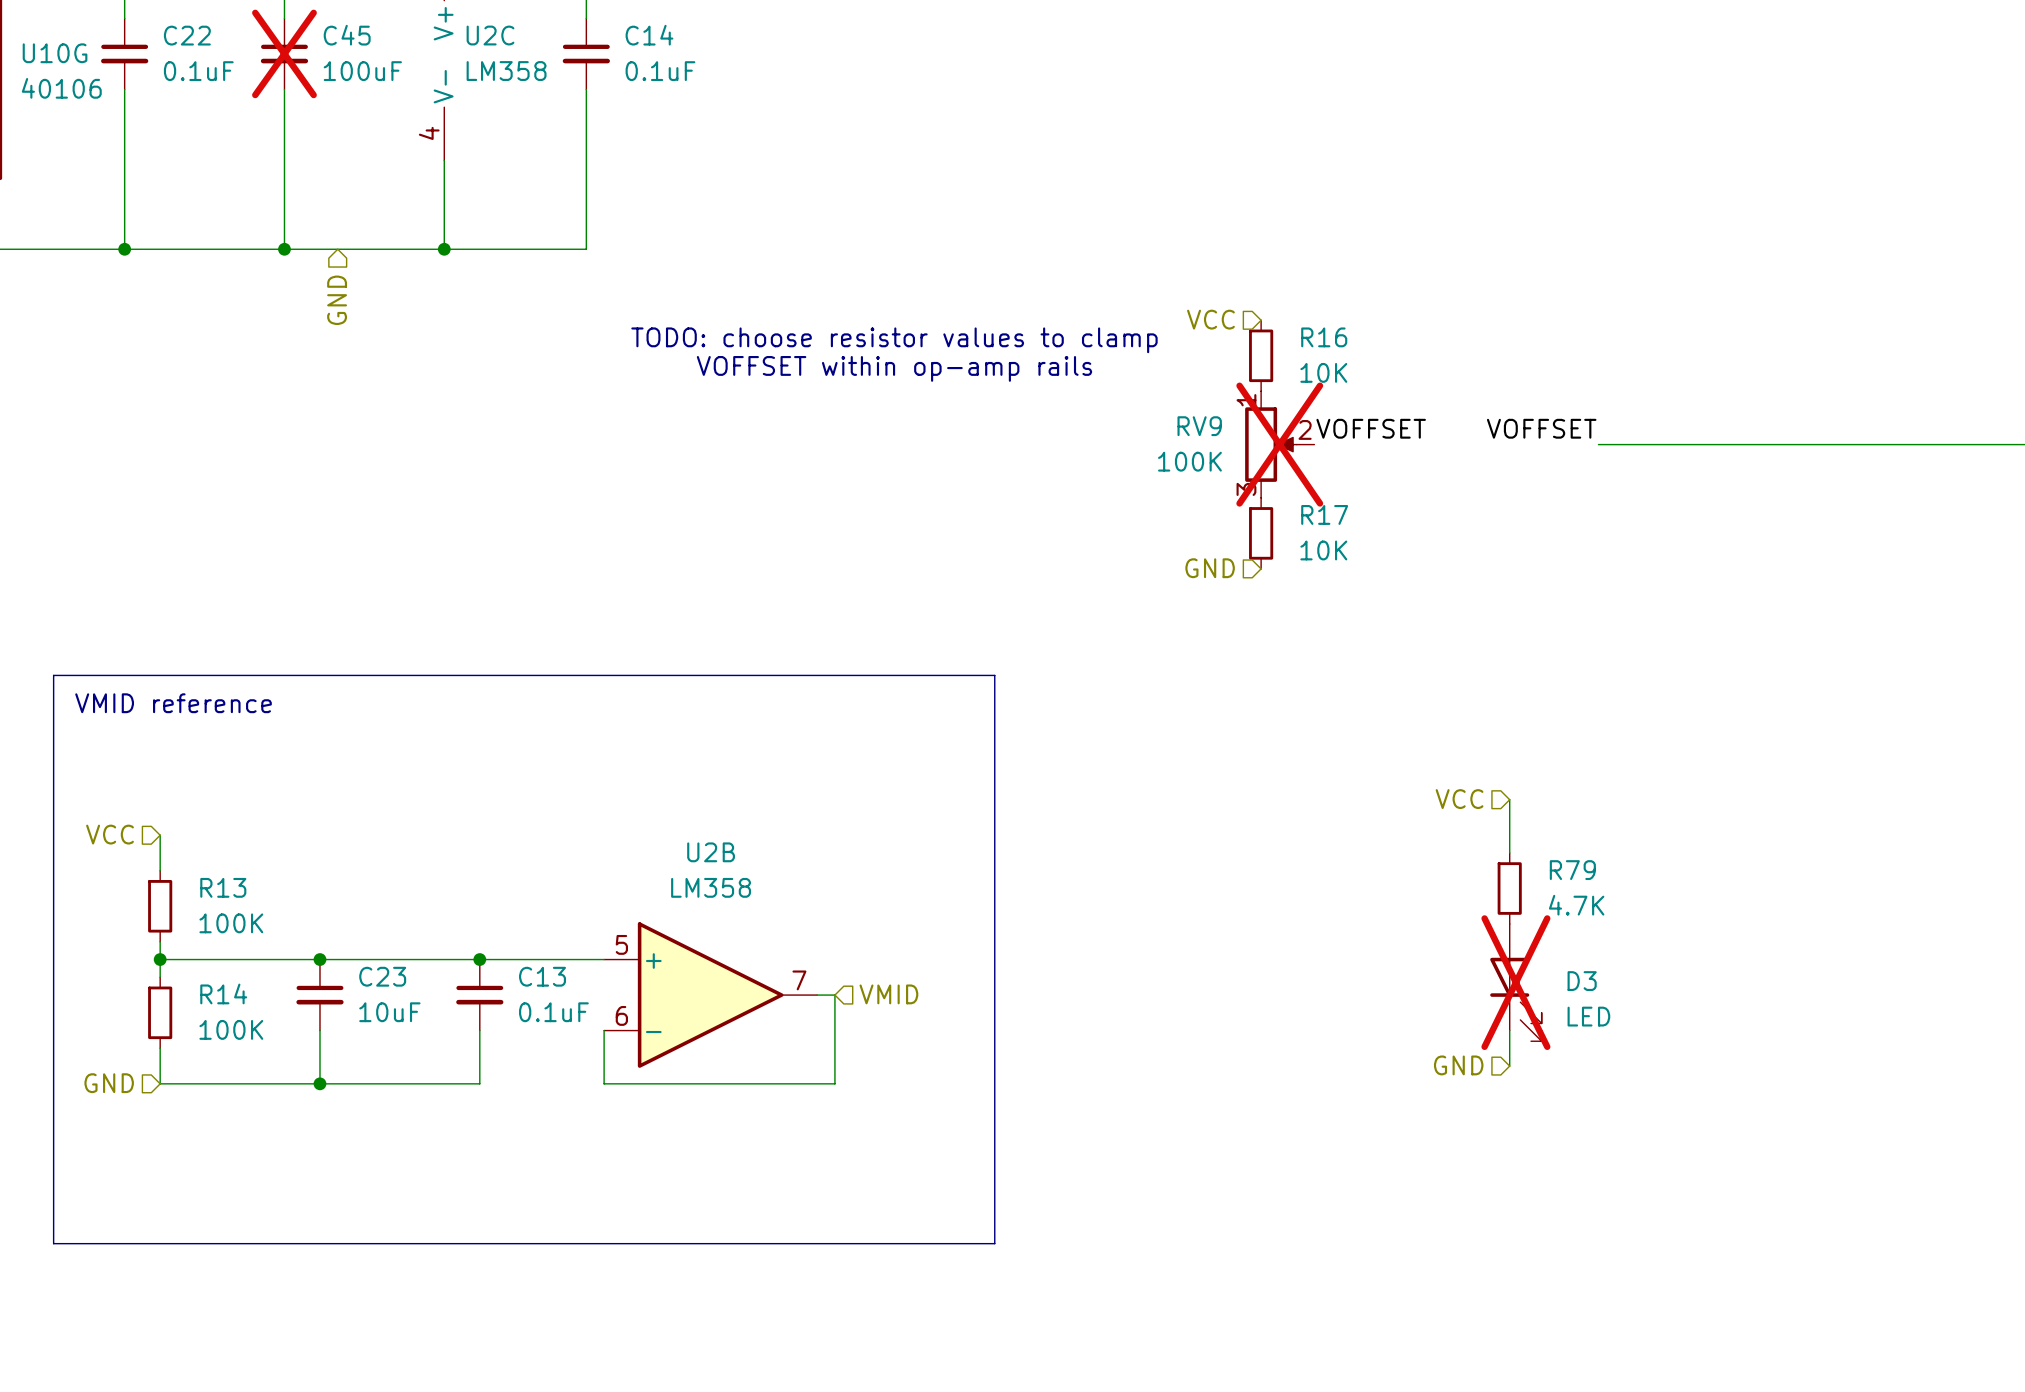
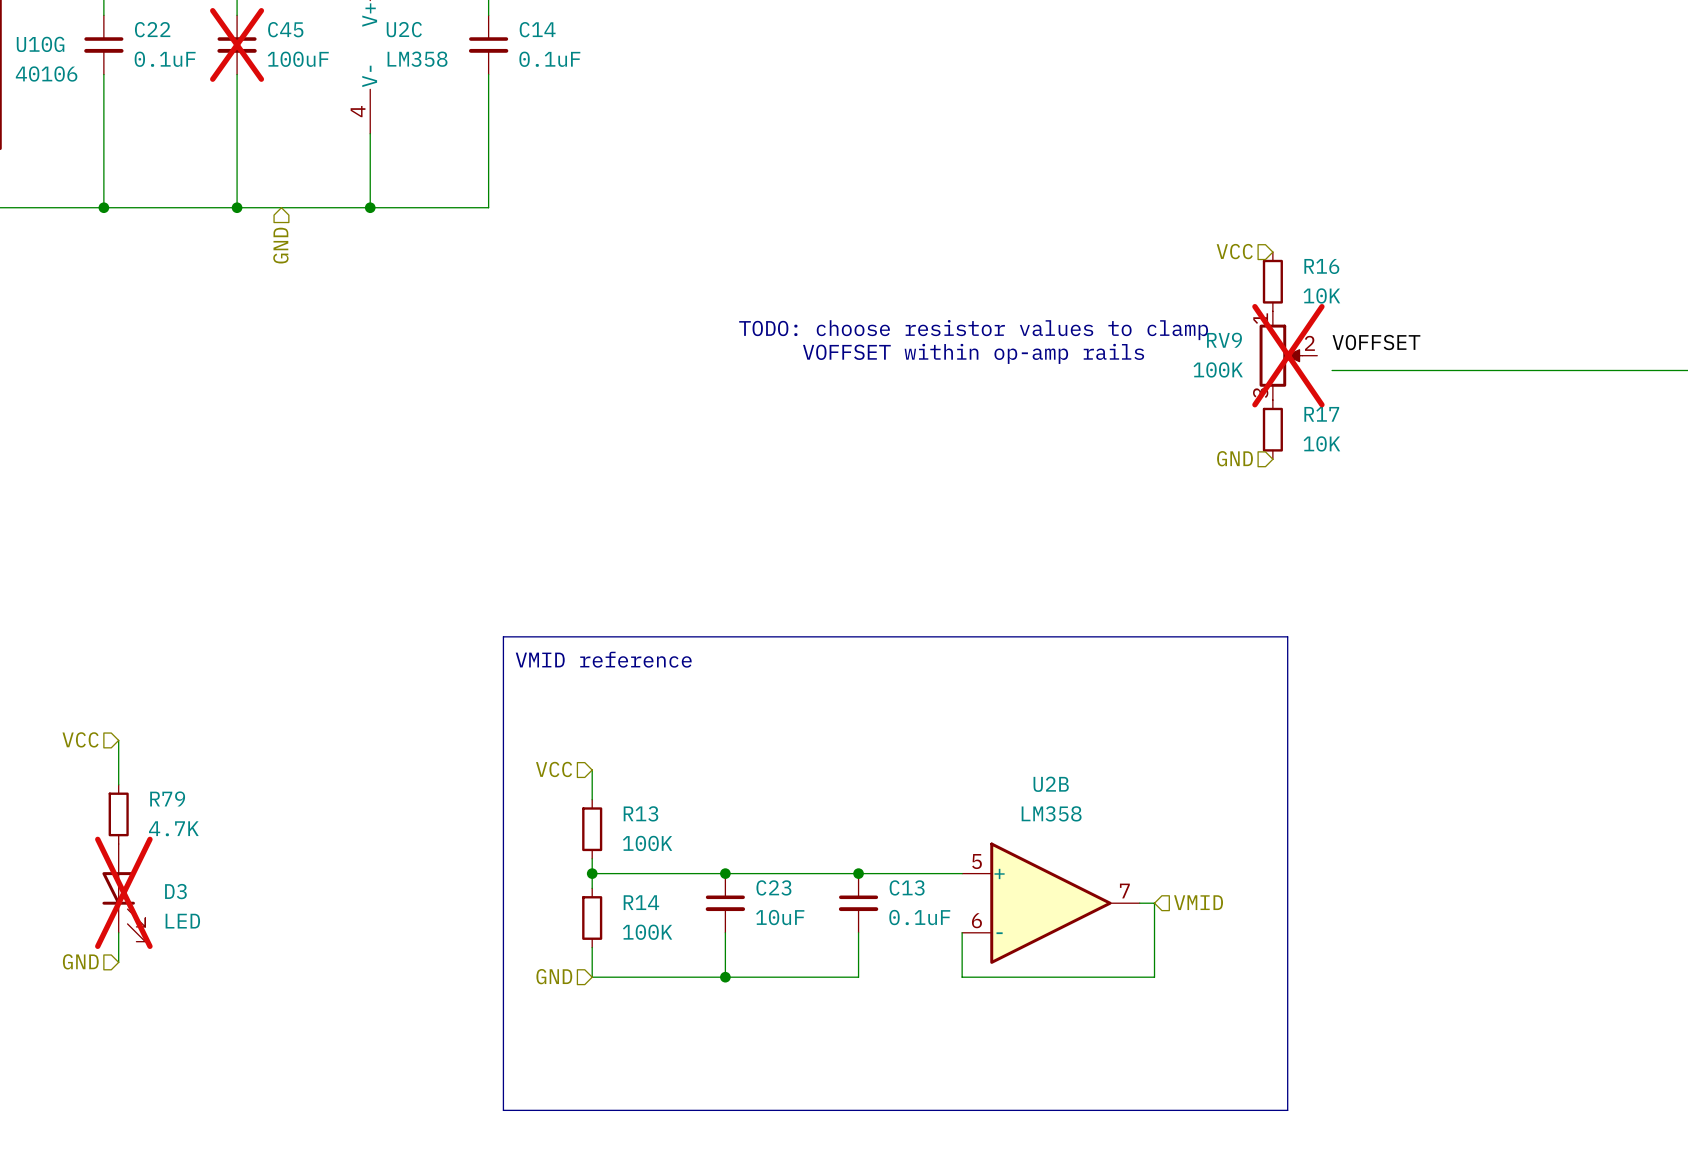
hierarchical label: none -> VCC (1234, 251)
hierarchical label: VCC (1210, 319) -> none
text position: TODO: choose resistor values to clamp (894, 340) -> TODO: choose resistor values to clamp (973, 330)
R16 position: (1261, 355) -> (1272, 281)
text position: VOFFSET within op-amp rails (894, 368) -> VOFFSET within op-amp rails (973, 353)
label: VOFFSET (1371, 428) -> none
label position: VOFFSET (1541, 428) -> VOFFSET (1376, 342)
RV9 position: (1279, 444) -> (1288, 355)
R17 position: (1261, 533) -> (1272, 429)
hierarchical label: none -> GND (1235, 458)
hierarchical label: GND (1210, 568) -> none
line: (53, 675) (994, 675) (994, 1243) (53, 1243) (53, 675) -> none
text: VMID reference (173, 703) -> none
line: none -> (503, 636) (1287, 636) (1287, 1110) (503, 1110) (503, 636)
text: none -> VMID reference (603, 659)
hierarchical label: VCC (1459, 799) -> none
wire: (1509, 799) (1509, 853) -> none
hierarchical label position: VCC (110, 834) -> VCC (80, 739)
wire: (160, 835) (160, 870) -> none
R79 position: (1509, 888) -> (118, 814)
R13 position: (160, 906) -> (592, 829)
hierarchical label: none -> VCC (554, 769)
wire: none -> (592, 770) (592, 799)
wire: (160, 941) (160, 977) -> (118, 932) (118, 962)
wire: (160, 959) (604, 959) -> none
junction: (160, 959) -> none
junction: (319, 959) -> none
junction: (479, 959) -> none
D3 position: (1515, 982) -> (123, 892)
hierarchical label: VMID (888, 994) -> none
C23 position: (319, 995) -> (725, 903)
C13 position: (479, 995) -> (858, 903)
U2B position: (710, 995) -> (1050, 903)
wire: (817, 995) (834, 995) (834, 1083) (604, 1083) (604, 1030) -> none
R14 position: (160, 1012) -> (592, 918)
wire: (319, 1030) (319, 1083) -> (118, 740) (118, 784)
wire: (479, 1030) (479, 1083) (160, 1083) (160, 1048) -> none
wire: none -> (592, 858) (592, 888)
wire: (1509, 1030) (1509, 1066) -> none
wire: none -> (592, 873) (962, 873)
junction: none -> (592, 873)
junction: none -> (725, 873)
junction: none -> (858, 873)
hierarchical label: GND (1458, 1065) -> none
hierarchical label position: GND (109, 1083) -> GND (80, 961)
junction: (319, 1083) -> none
wire: none -> (1139, 903) (1154, 903) (1154, 977) (962, 977) (962, 932)
hierarchical label: none -> VMID (1198, 902)
wire: none -> (725, 932) (725, 977)
wire: none -> (858, 932) (858, 977) (592, 977) (592, 947)
hierarchical label: none -> GND (554, 976)
junction: none -> (725, 977)

